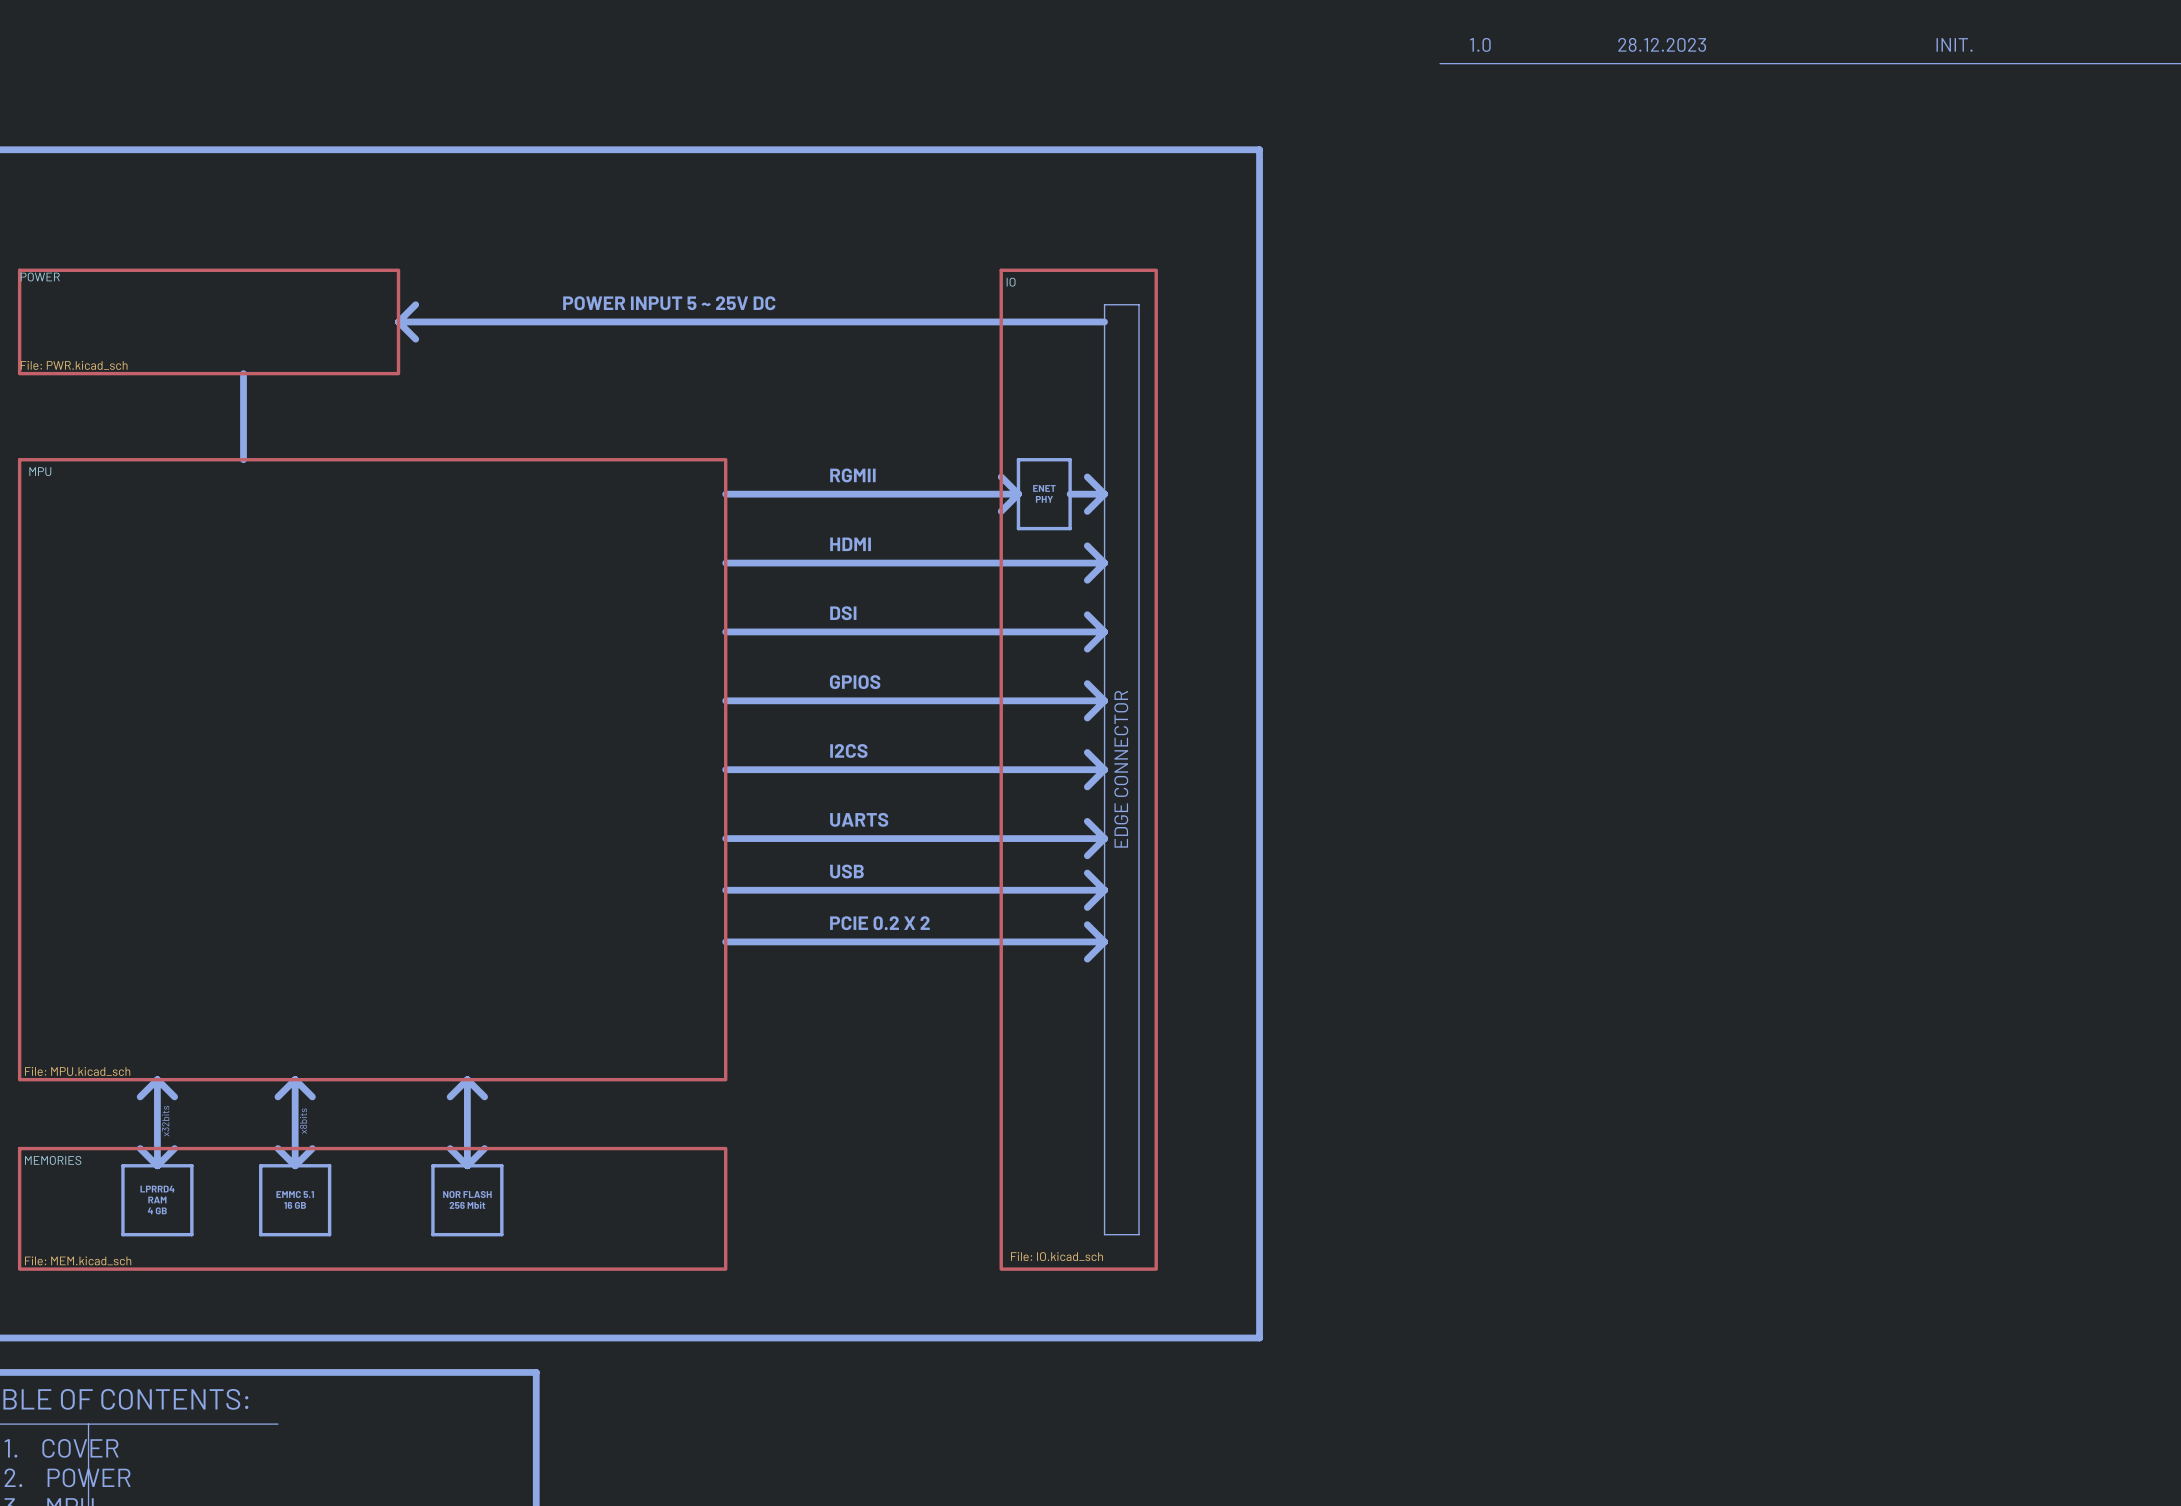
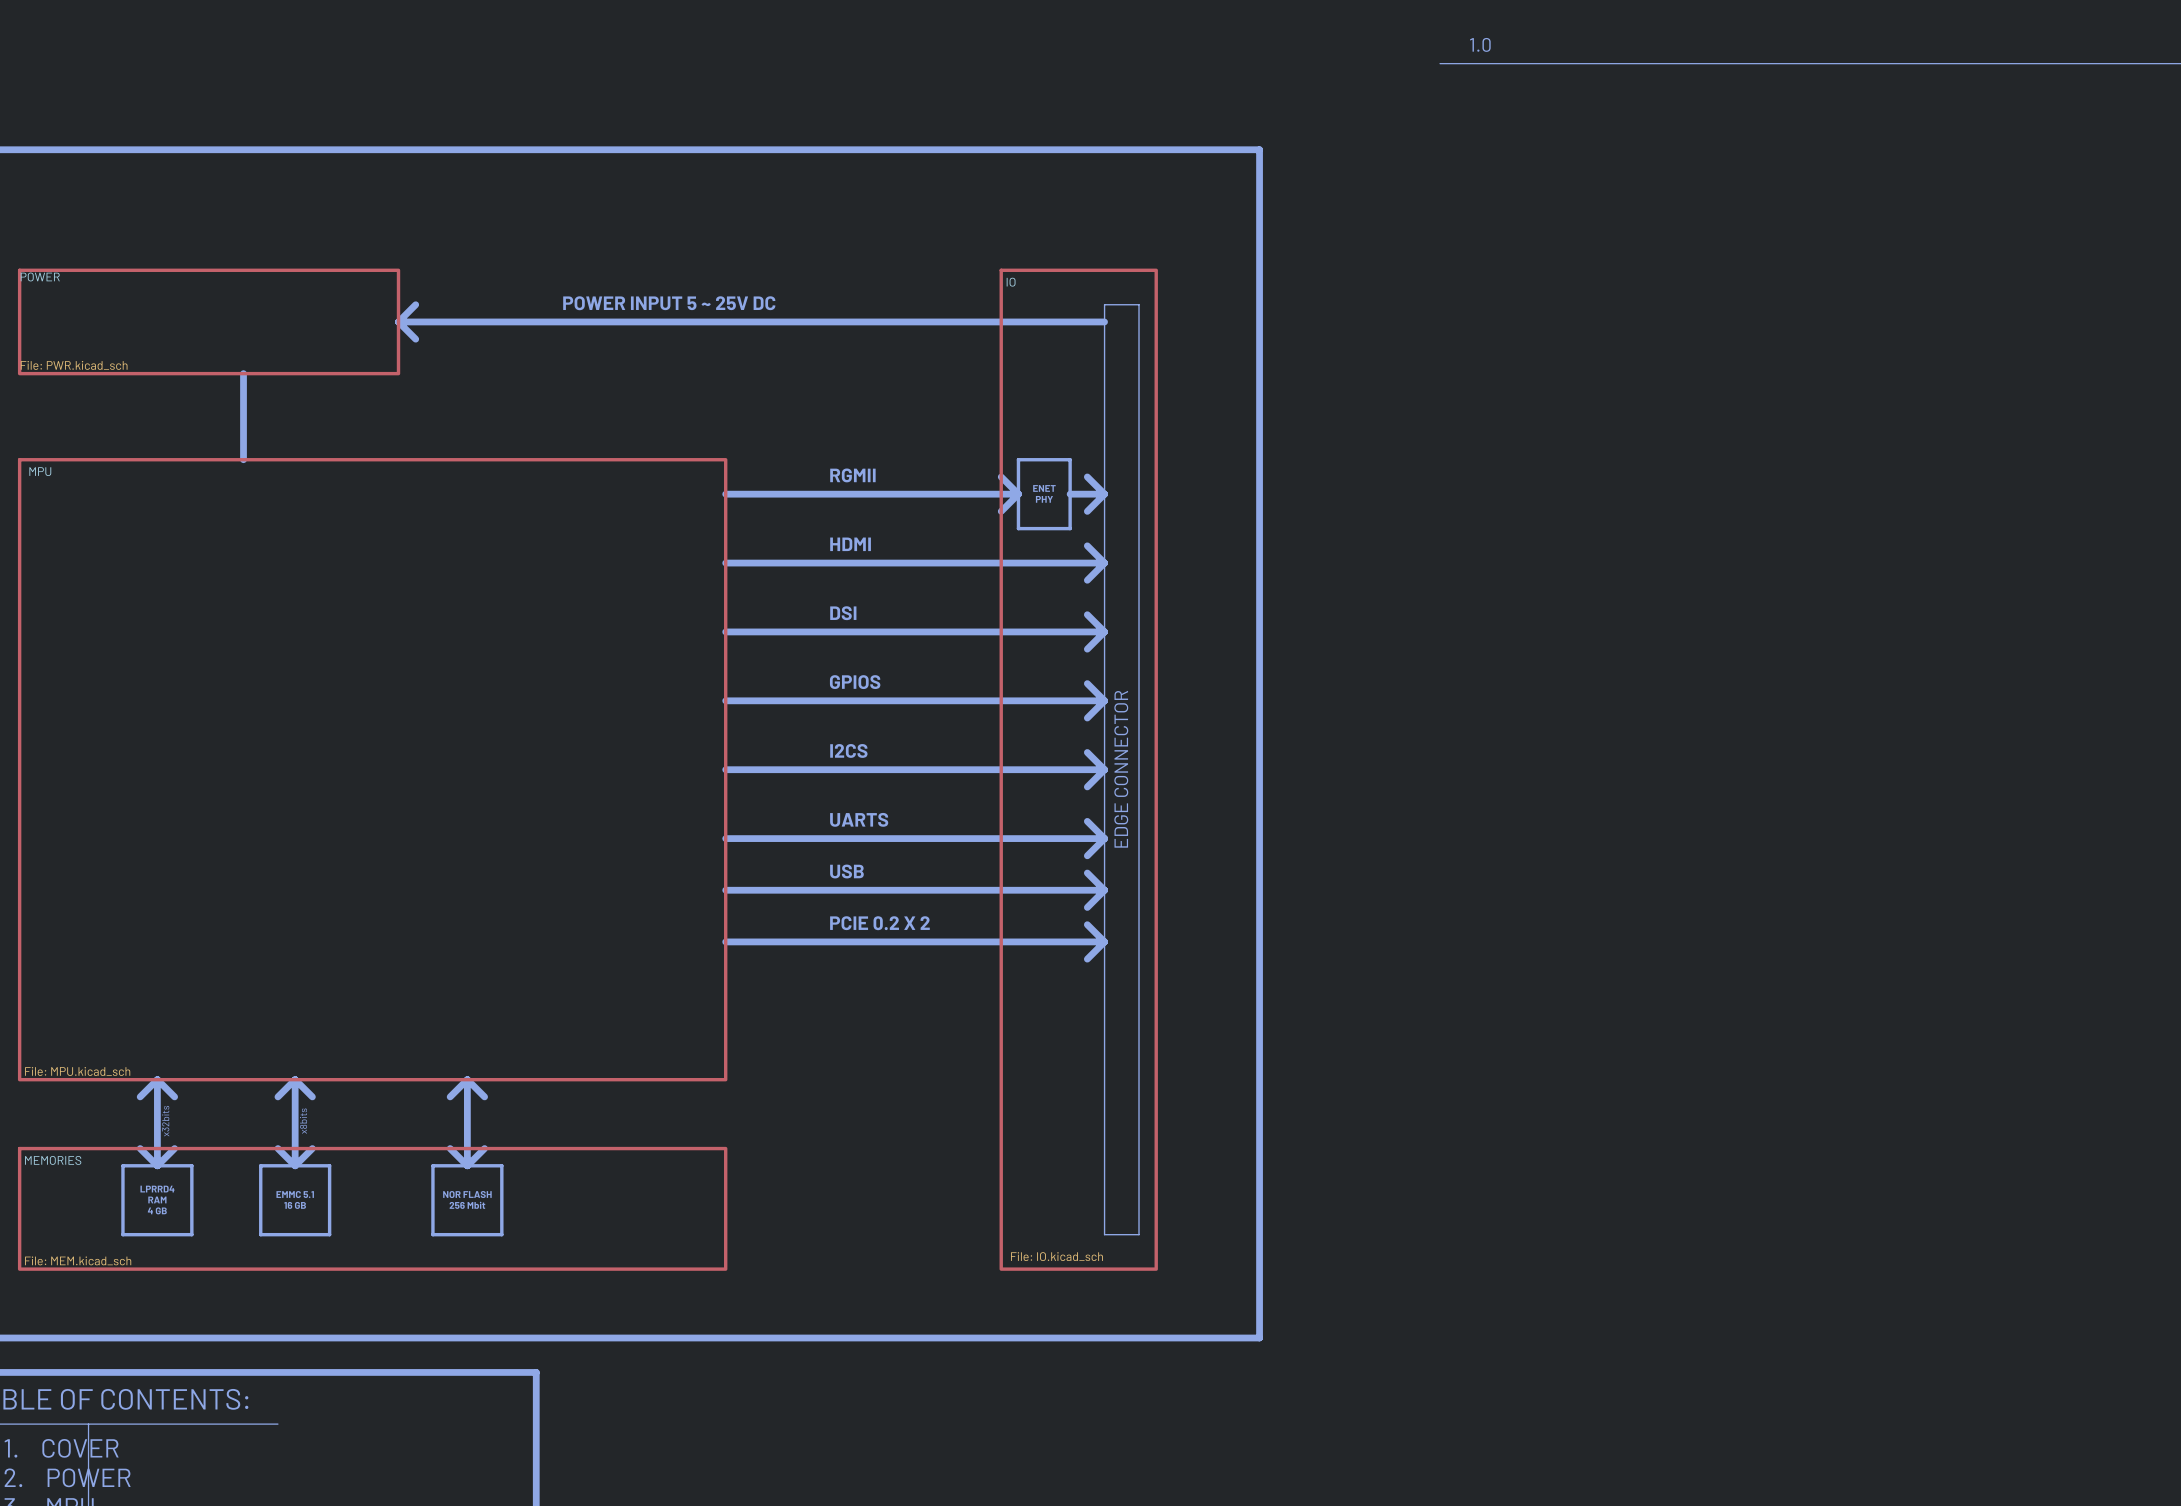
text: 28.12.2023 (1662, 44) -> none
text: INIT. (1954, 44) -> none

